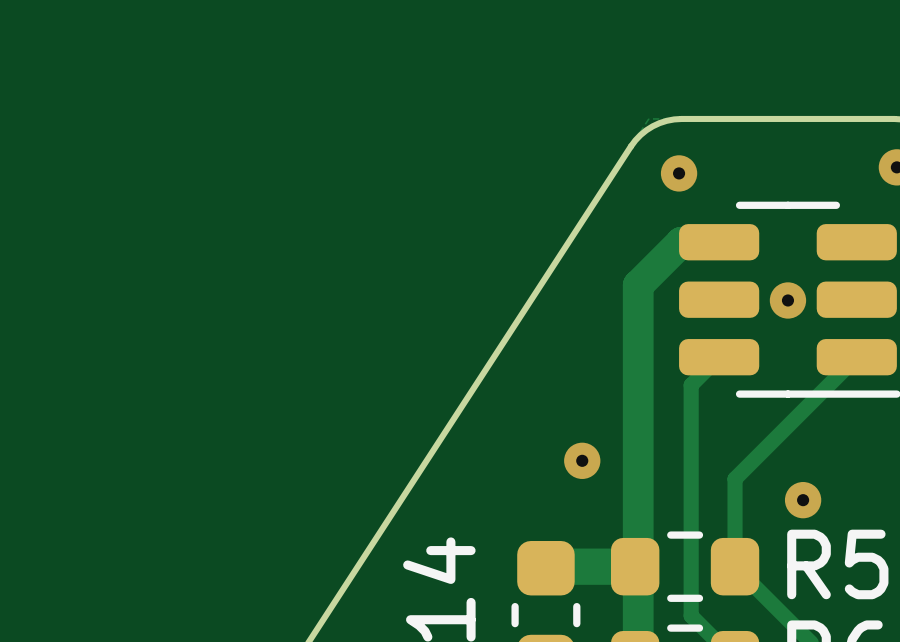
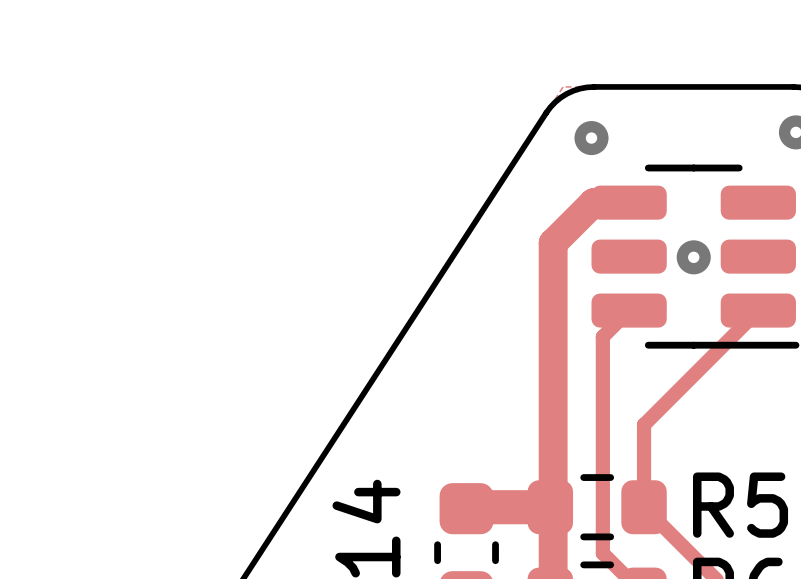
via: (582, 460) -> none
via: (803, 500) -> none

